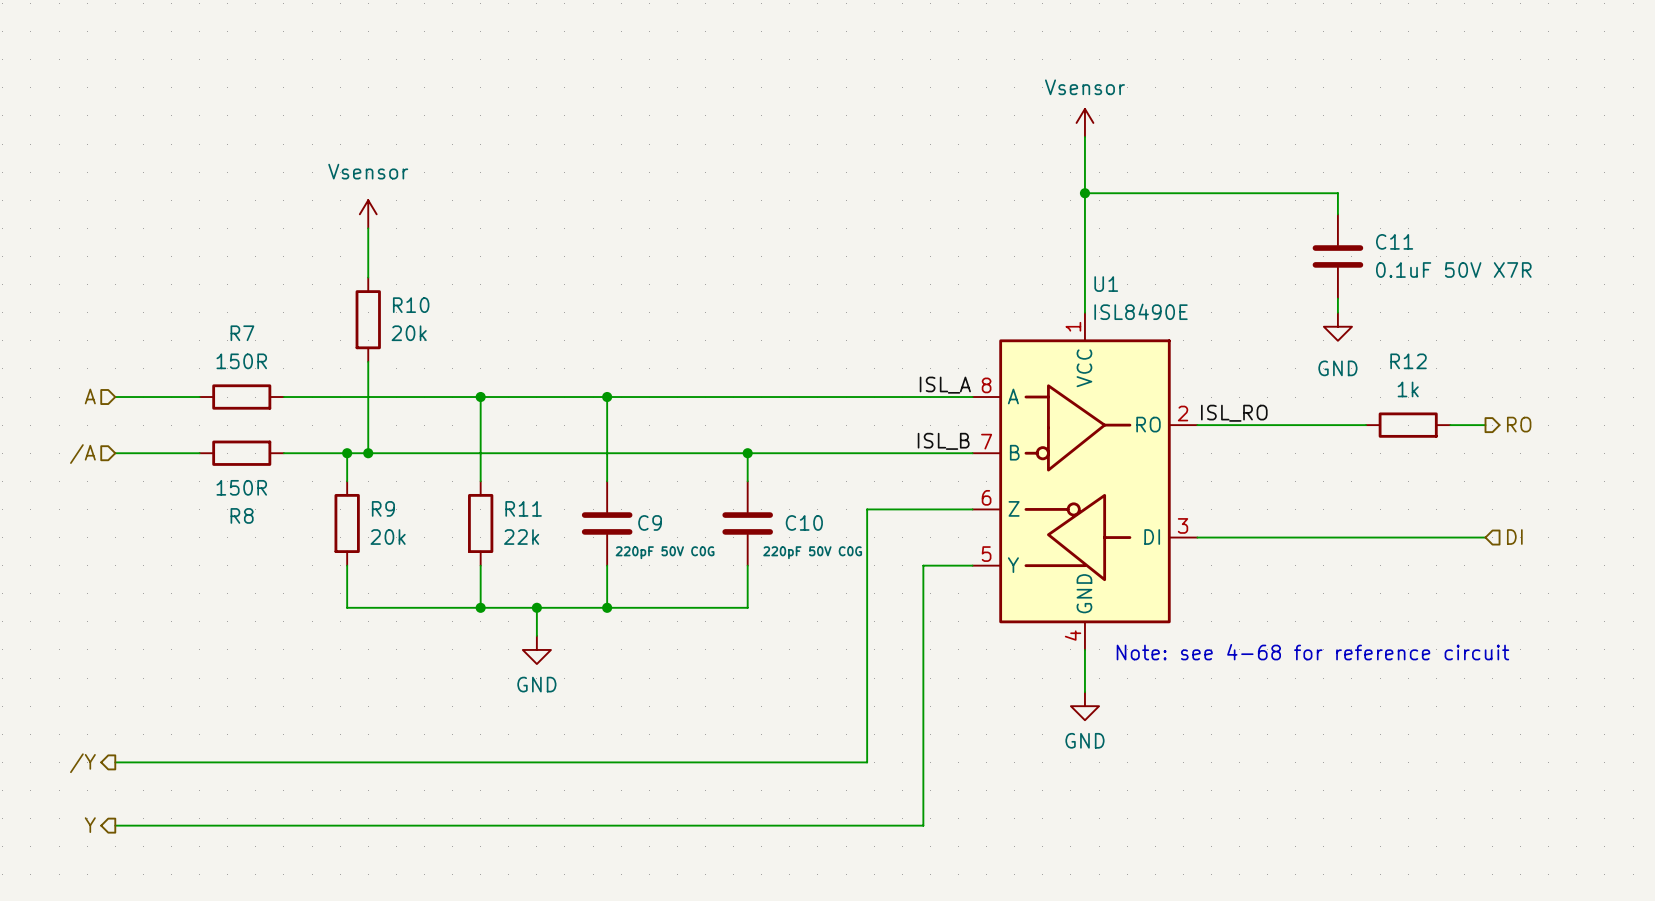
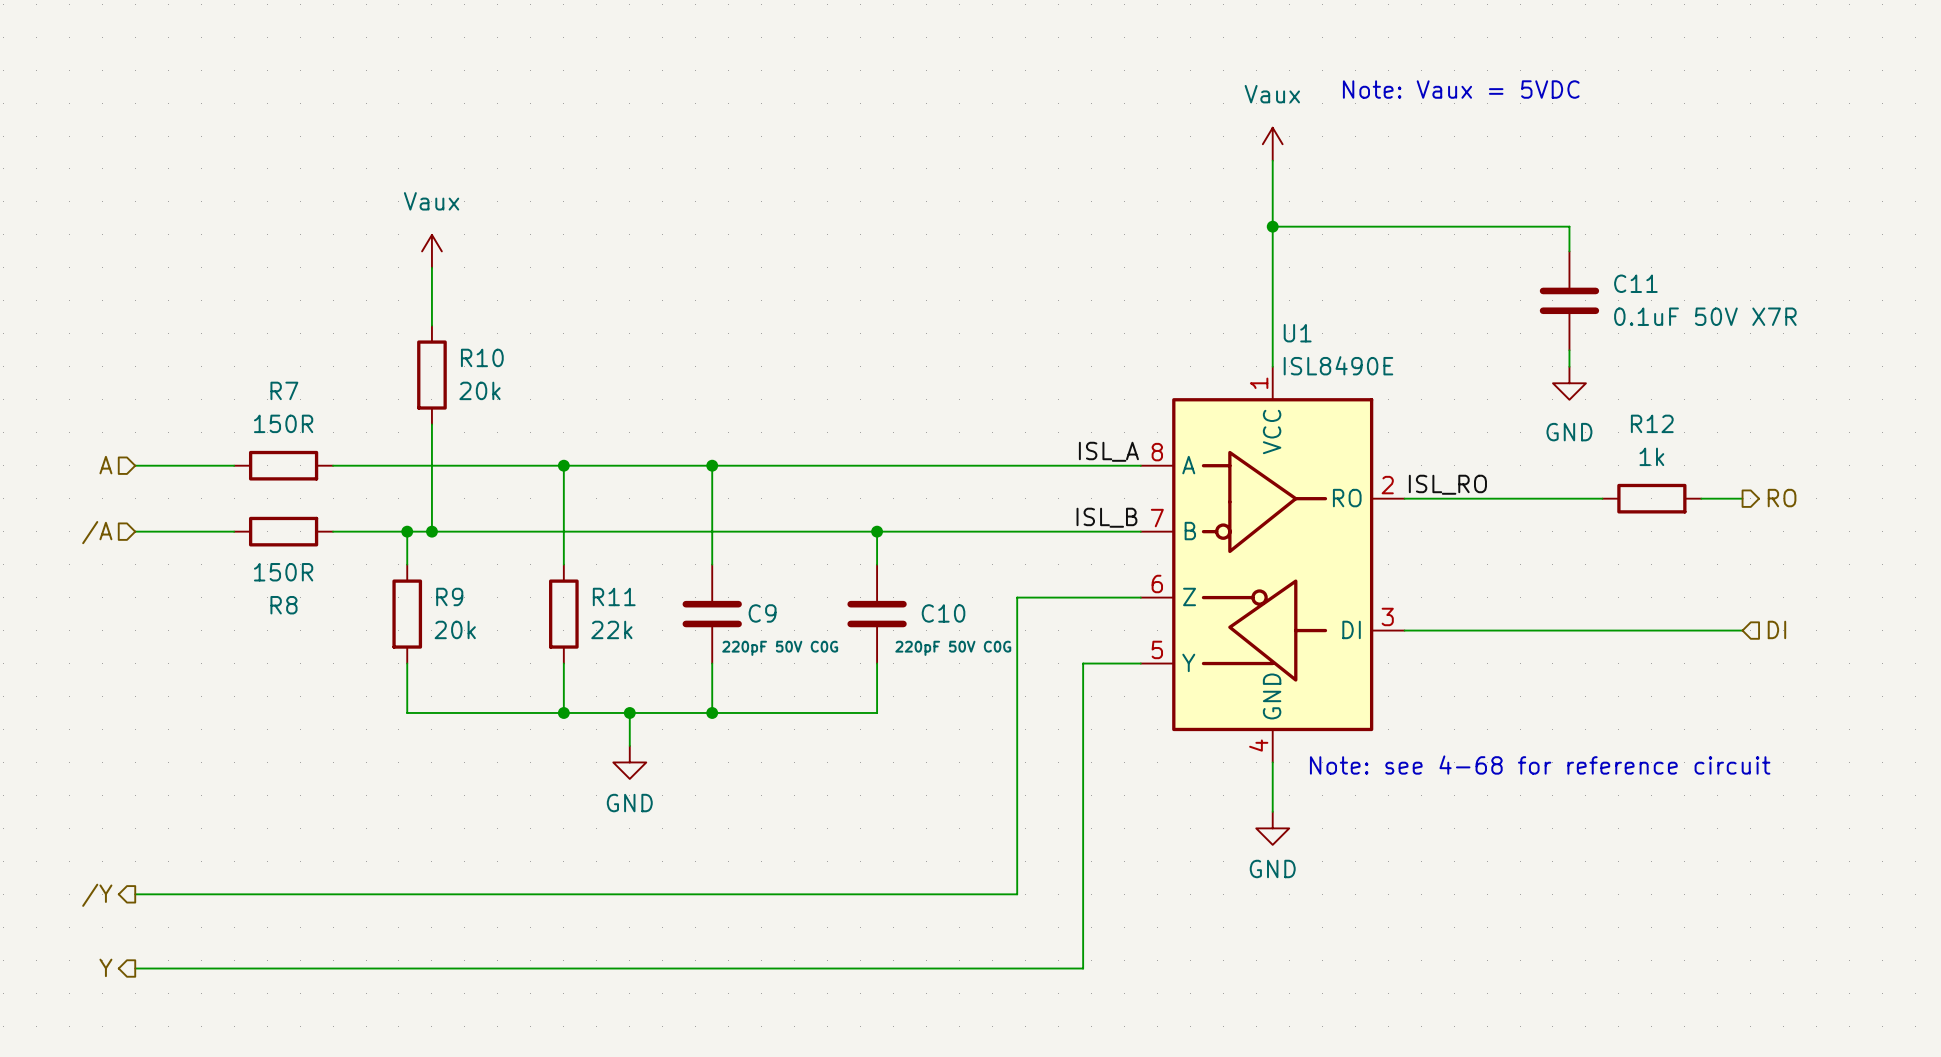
text: none -> Note: Vaux = 5VDC (1461, 89)
power symbol: Vsensor (1084, 122) -> Vaux (1272, 144)
power symbol: Vsensor (368, 214) -> Vaux (431, 251)

